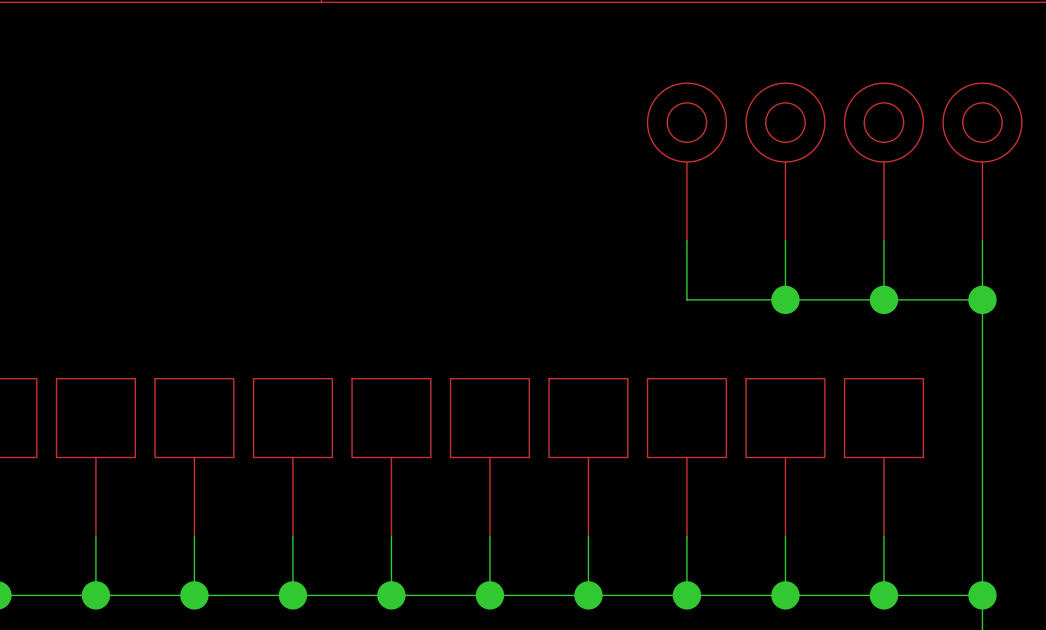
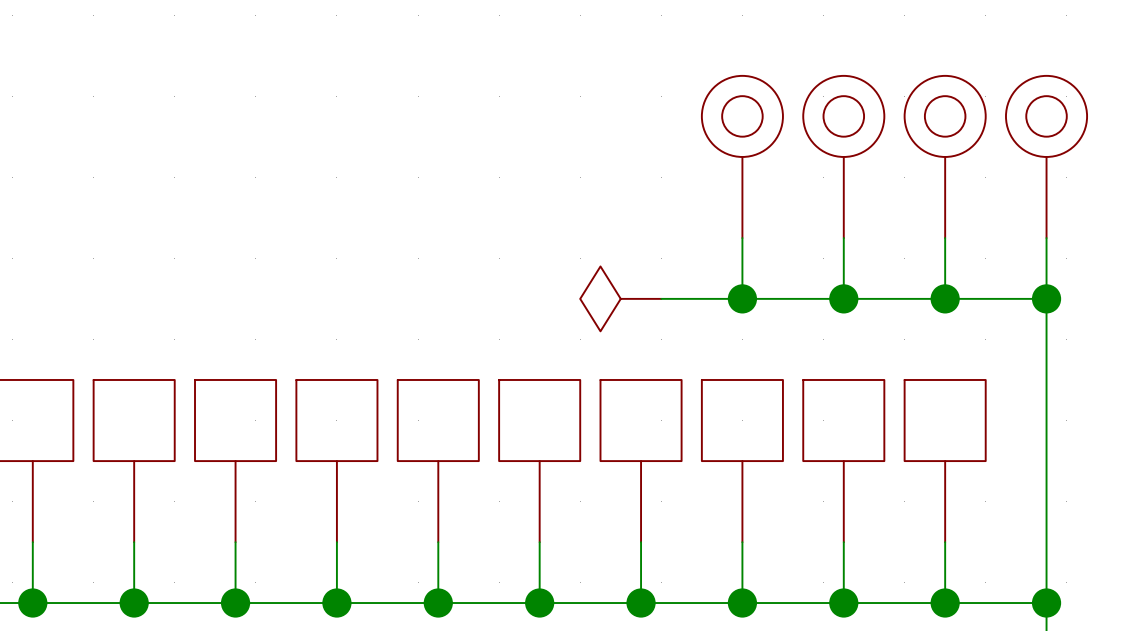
power symbol: none -> (620, 298)
wire: none -> (661, 298) (742, 298)
junction: none -> (742, 298)

